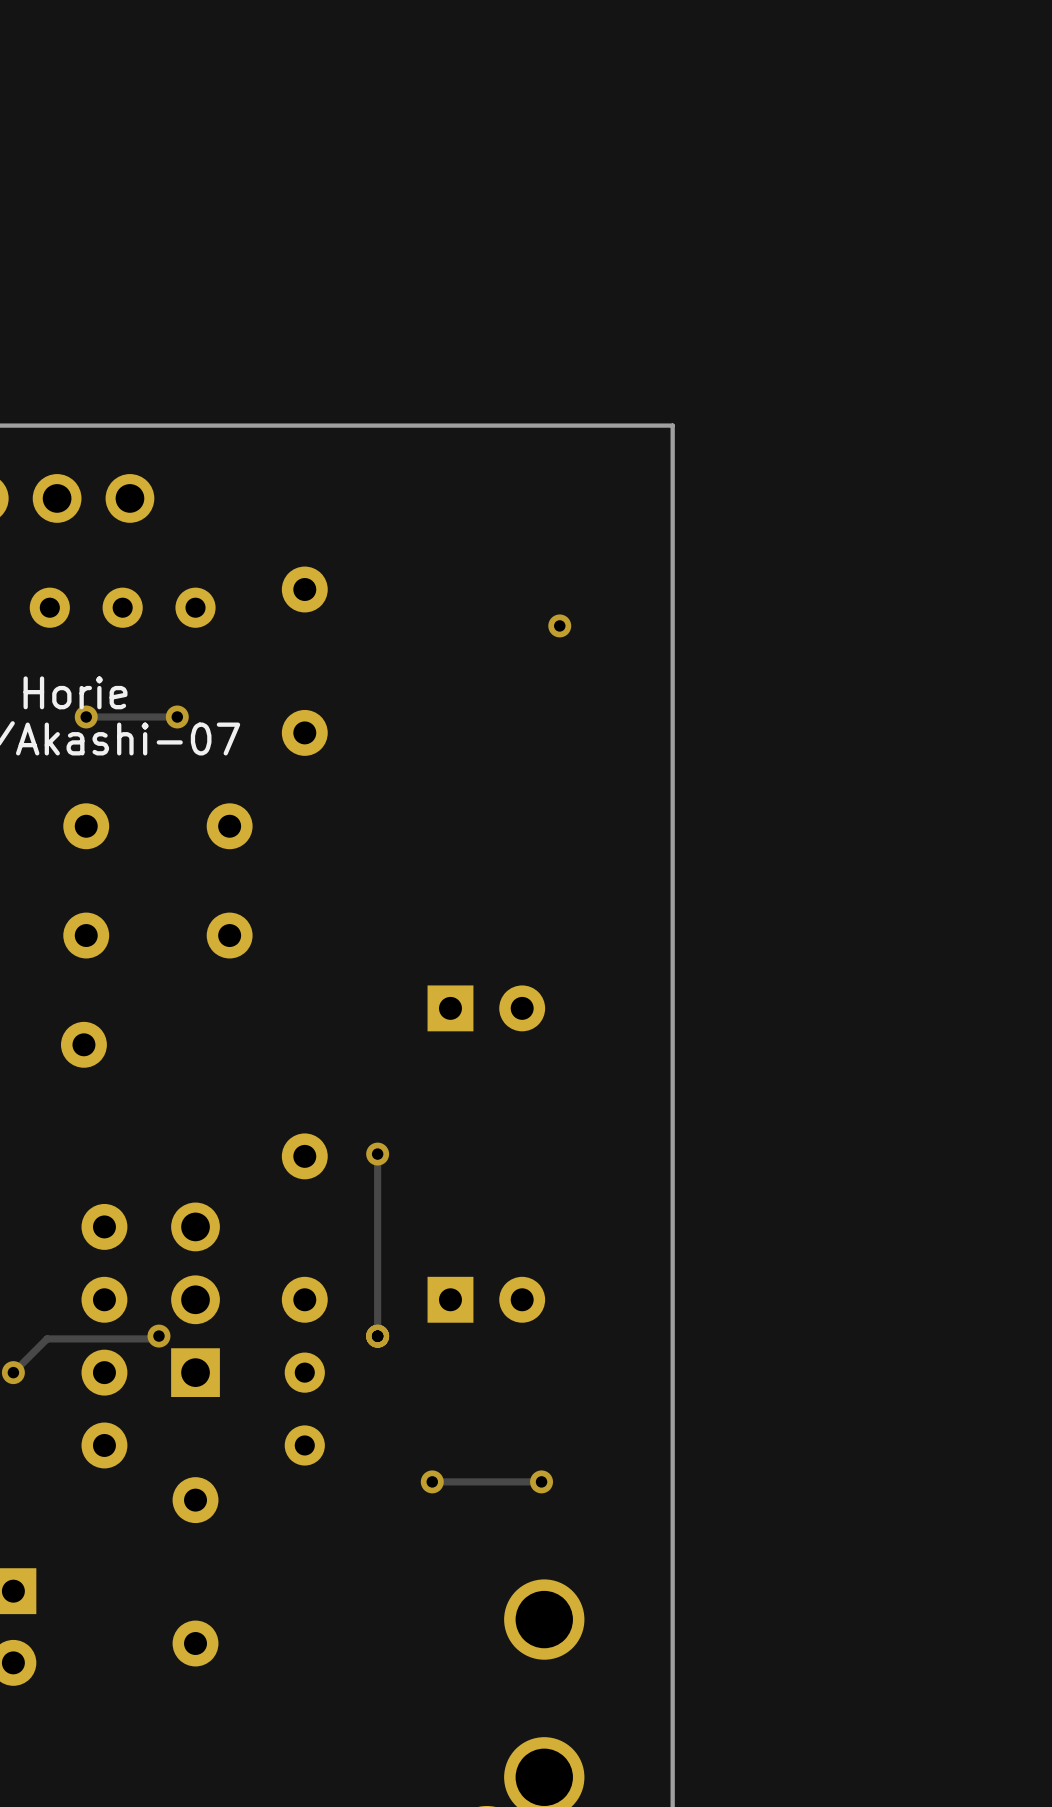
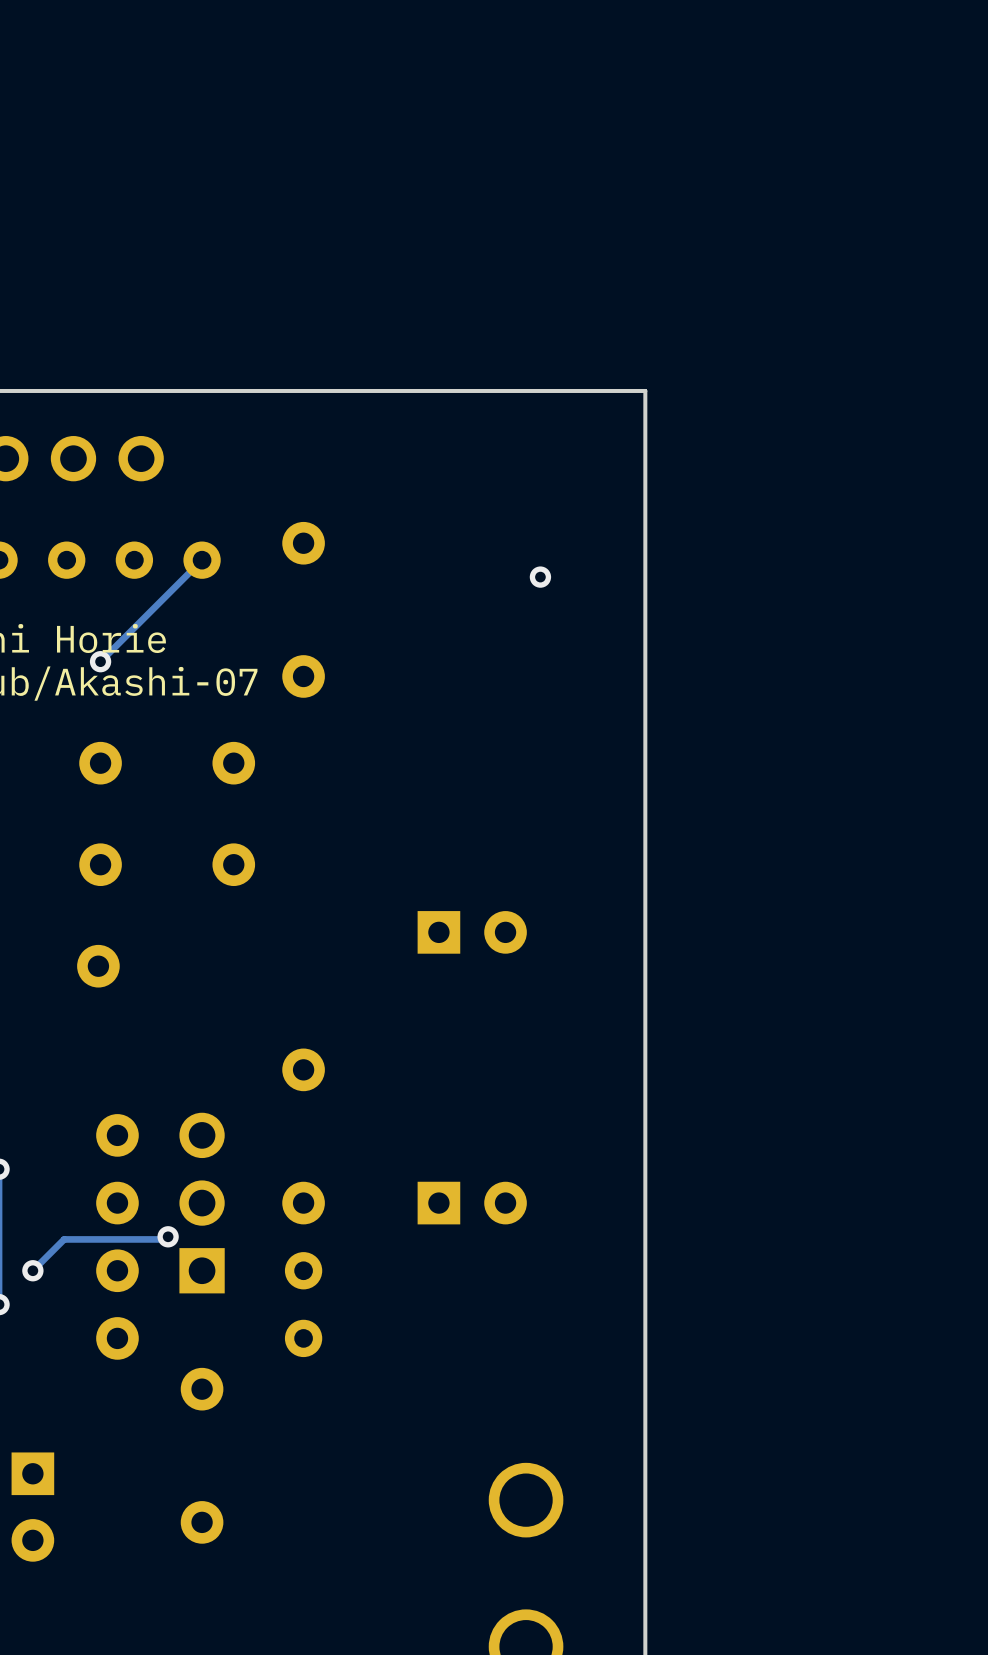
track: (177, 716) (86, 716) -> (202, 560) (100, 661)
via: (177, 716) -> none
track: (377, 1154) (377, 1336) -> none
via: (377, 1154) -> none
via: (377, 1336) -> none
via: (432, 1481) -> none
track: (541, 1481) (432, 1481) -> none
via: (541, 1481) -> none

